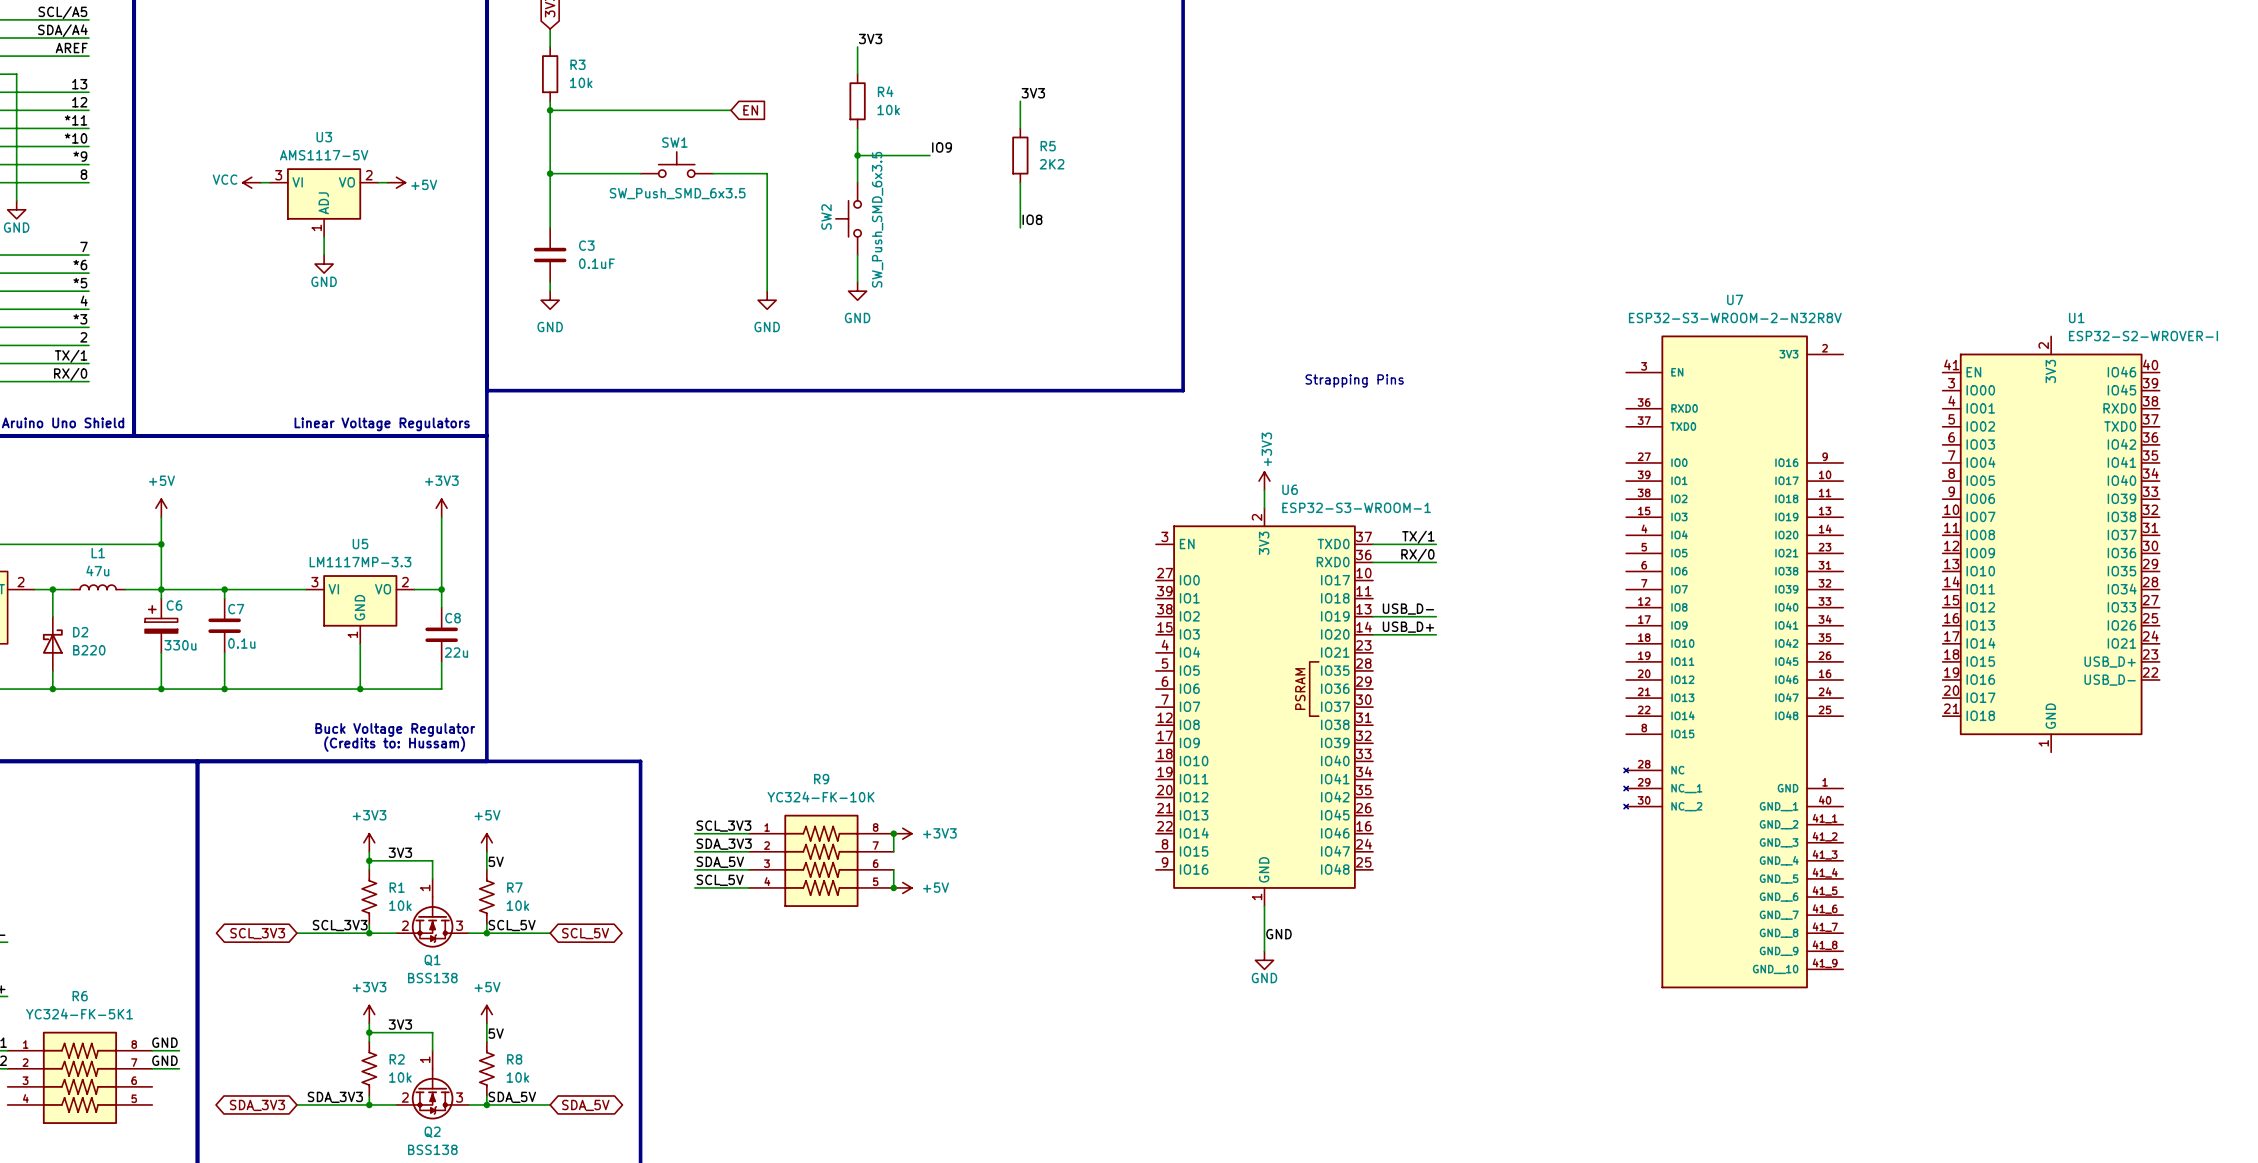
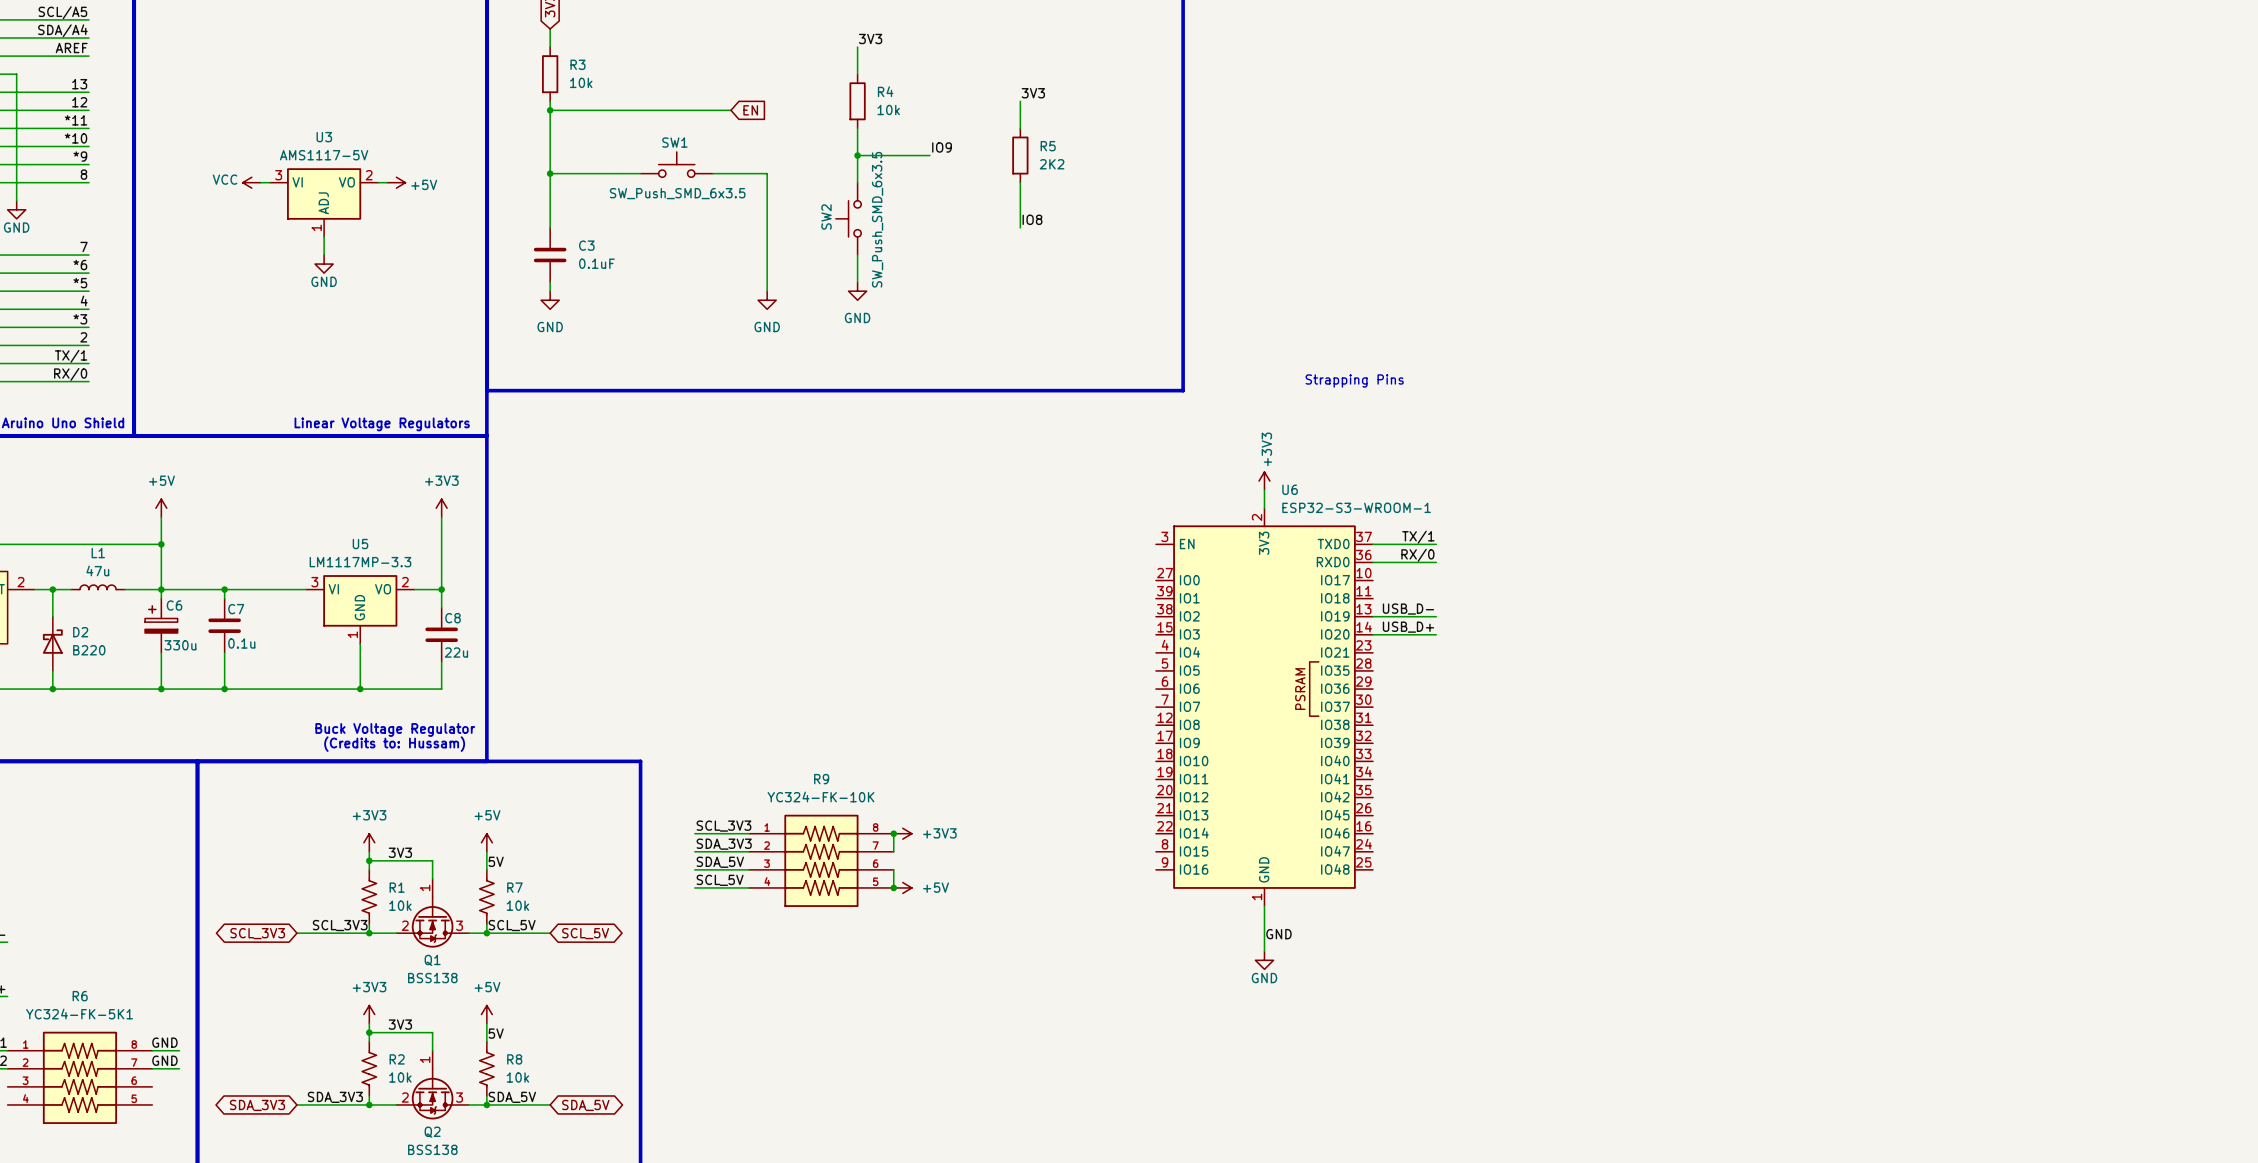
U1: ESP32-S2-WROVER-I (2051, 544) -> none
U7: ESP32-S3-WROOM-2-N32R8V (1733, 661) -> none

